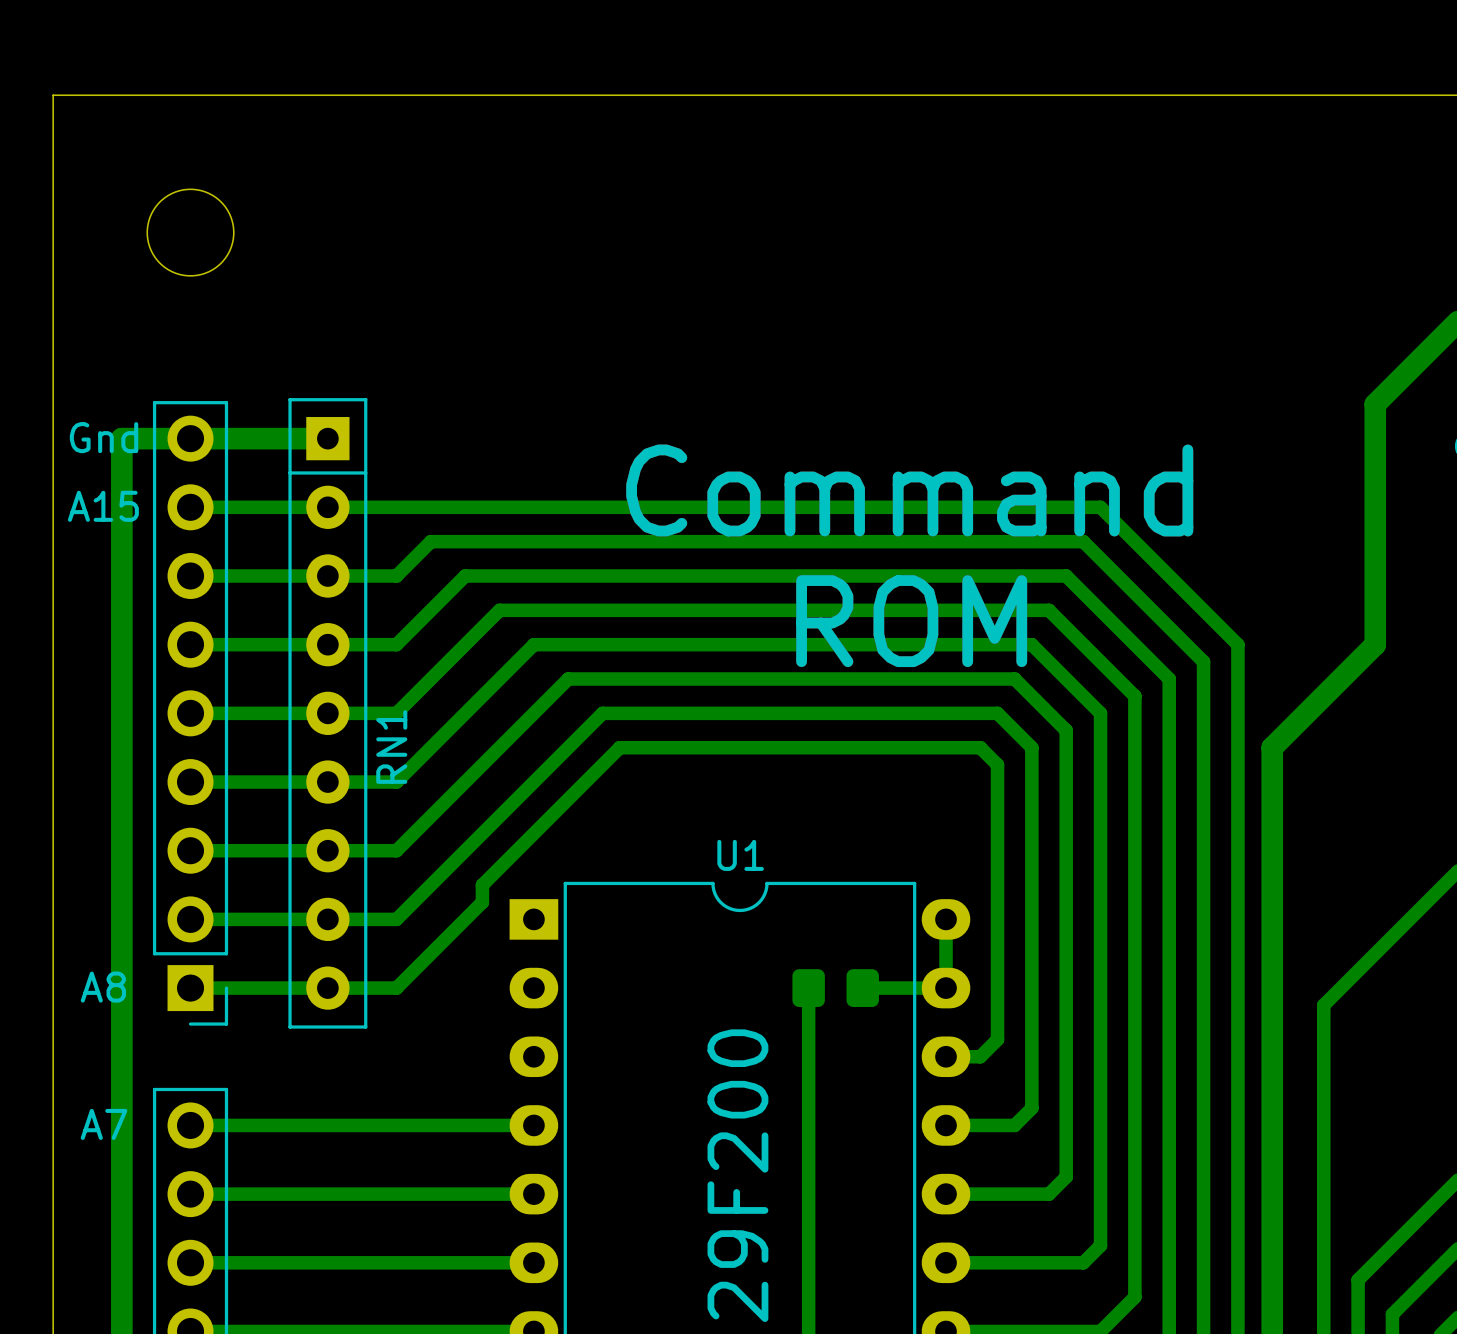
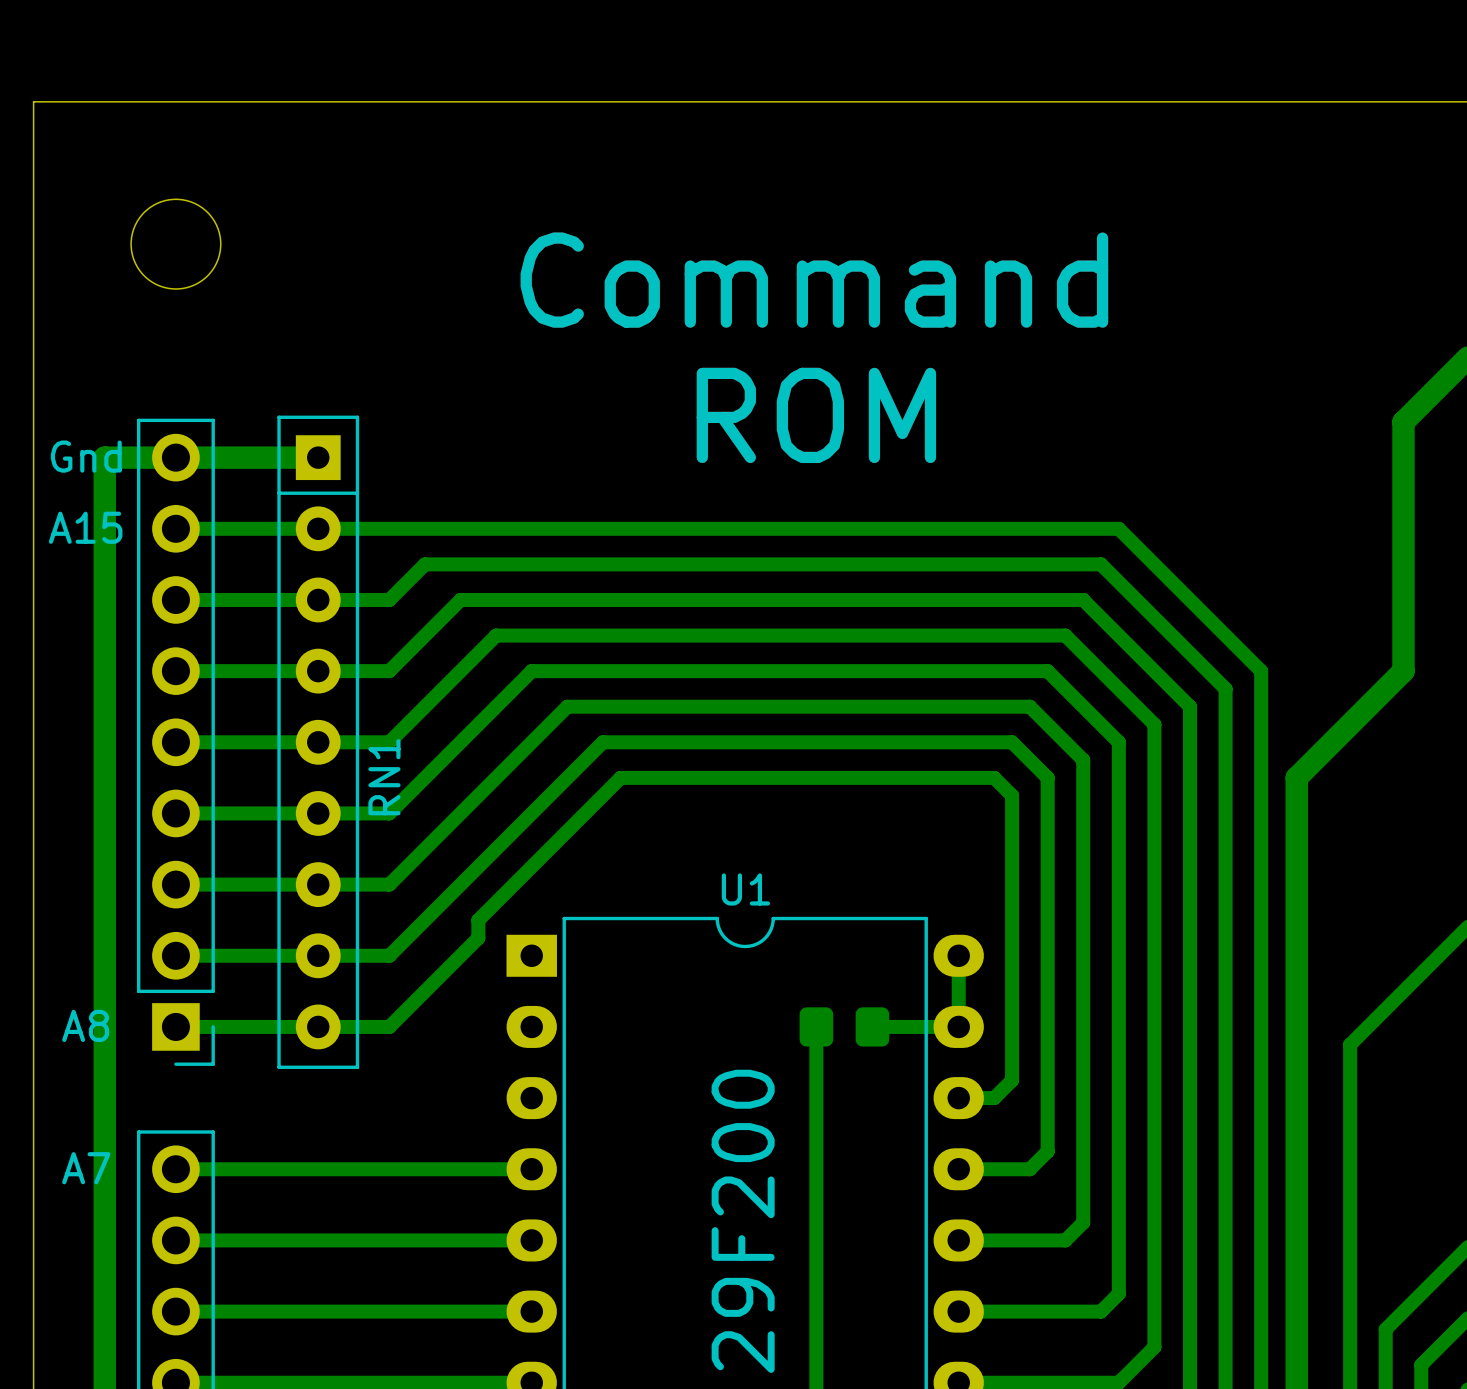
text: none -> Command (814, 280)
text: none -> ROM (816, 415)
text: Command (909, 490) -> none
text: ROM (911, 621) -> none

